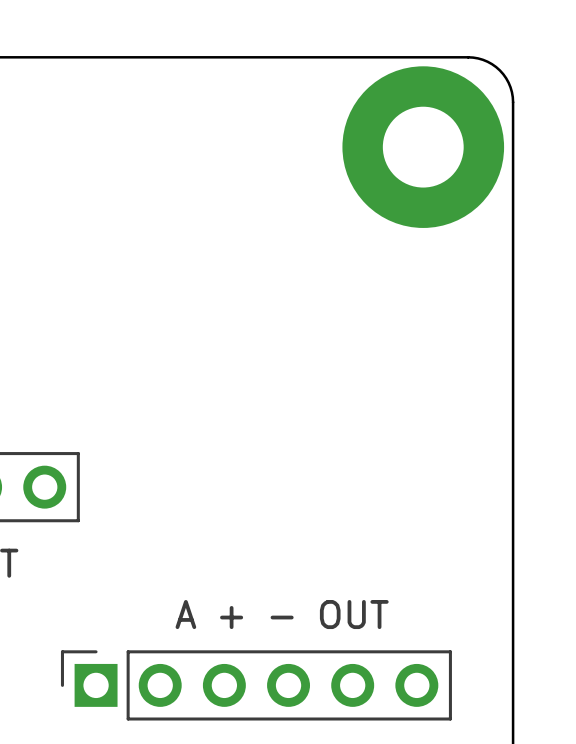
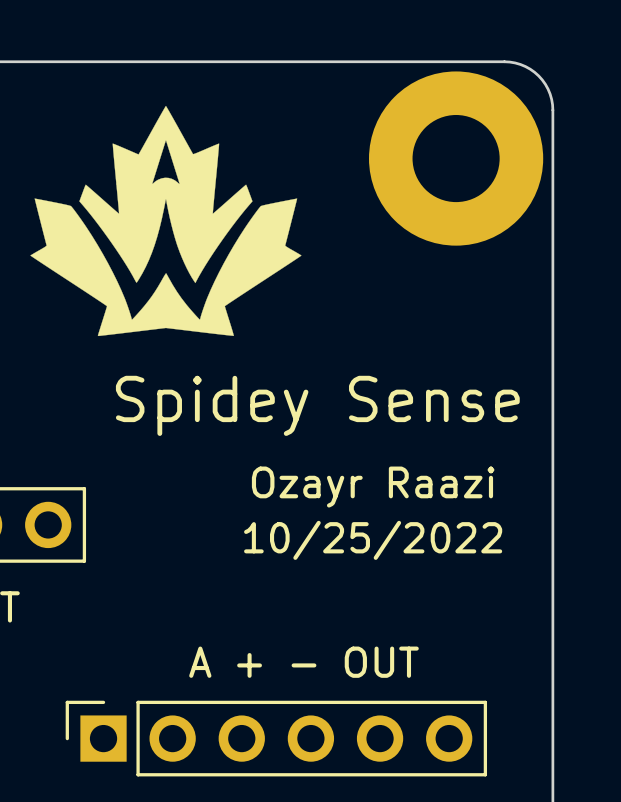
drawing: none -> [30, 105, 302, 337]
text: none -> Spidey Sense (317, 405)
text: none -> Ozayr Raazi (373, 487)
text: none -> 10/25/2022 (373, 540)

